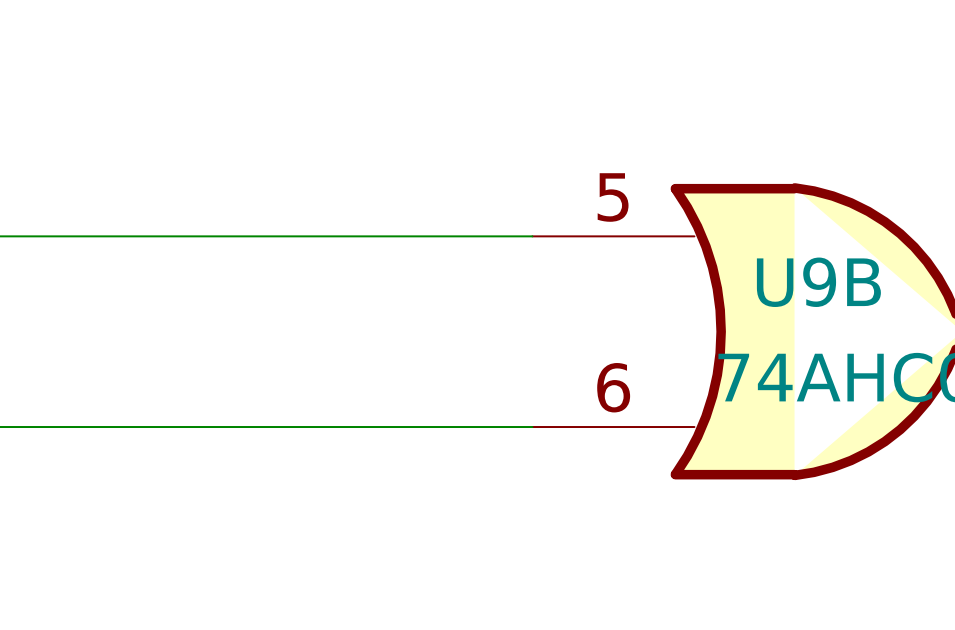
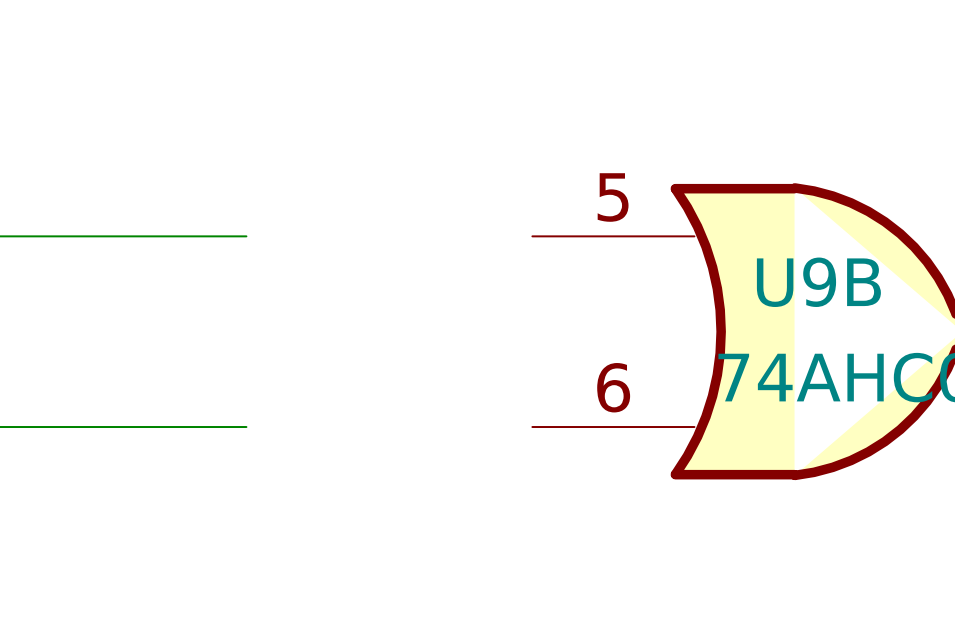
wire: (246, 236) (532, 236) -> none
wire: (246, 427) (532, 427) -> none

